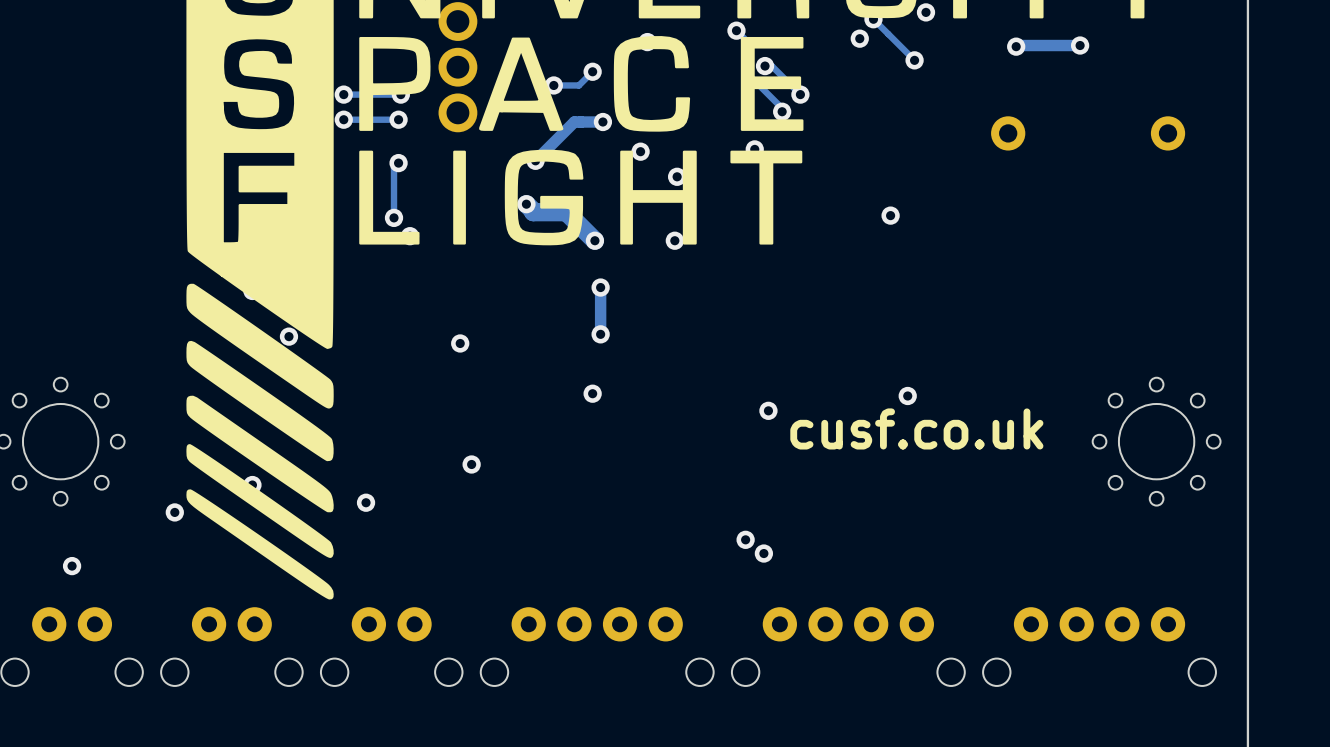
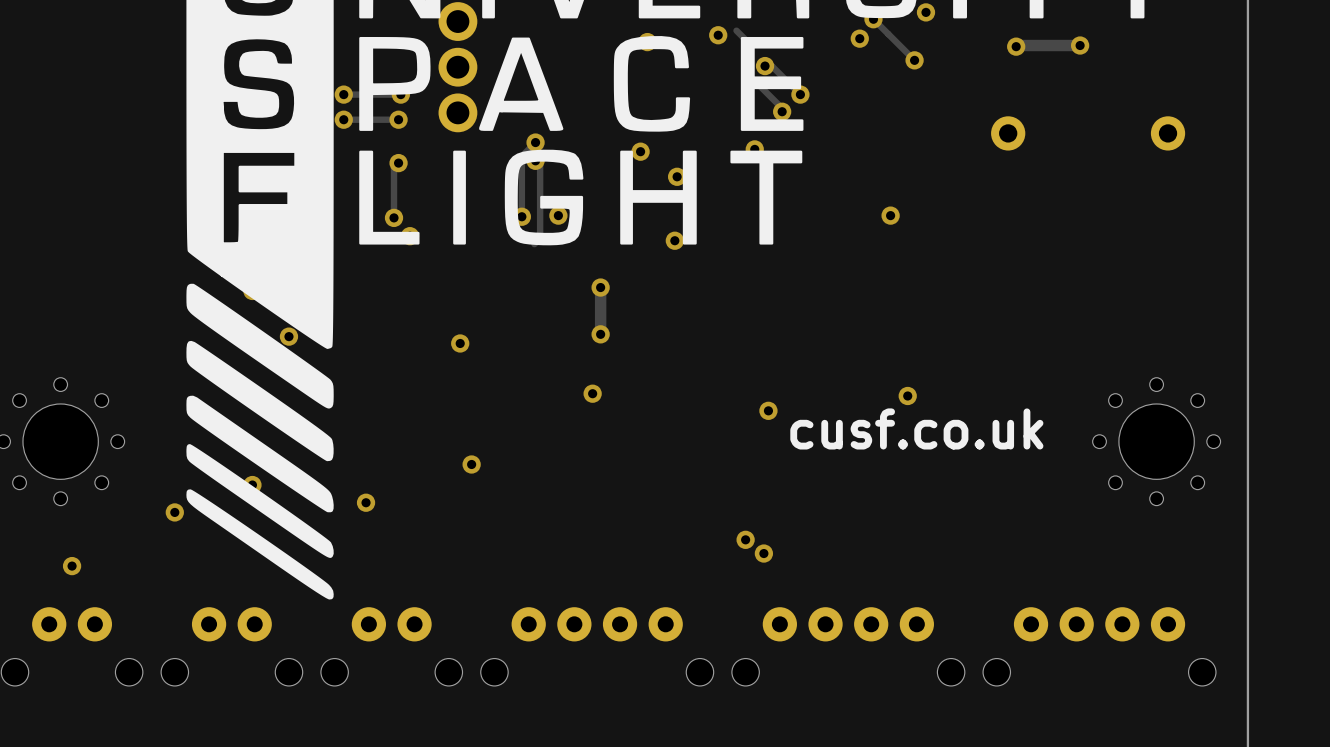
via position: (736, 30) -> (718, 35)
track: (592, 71) (578, 85) (553, 85) -> none
via: (592, 71) -> none
via: (553, 85) -> none
track: (602, 122) (574, 122) (535, 160) -> none
via: (602, 122) -> none
track: none -> (535, 142) (521, 156) (521, 216)
via: none -> (535, 142)
track: none -> (540, 165) (540, 238) (534, 244)
track: (526, 204) (533, 212) (566, 212) (594, 240) -> none
via position: (526, 204) -> (521, 216)
via: none -> (558, 215)
via: (594, 240) -> none

